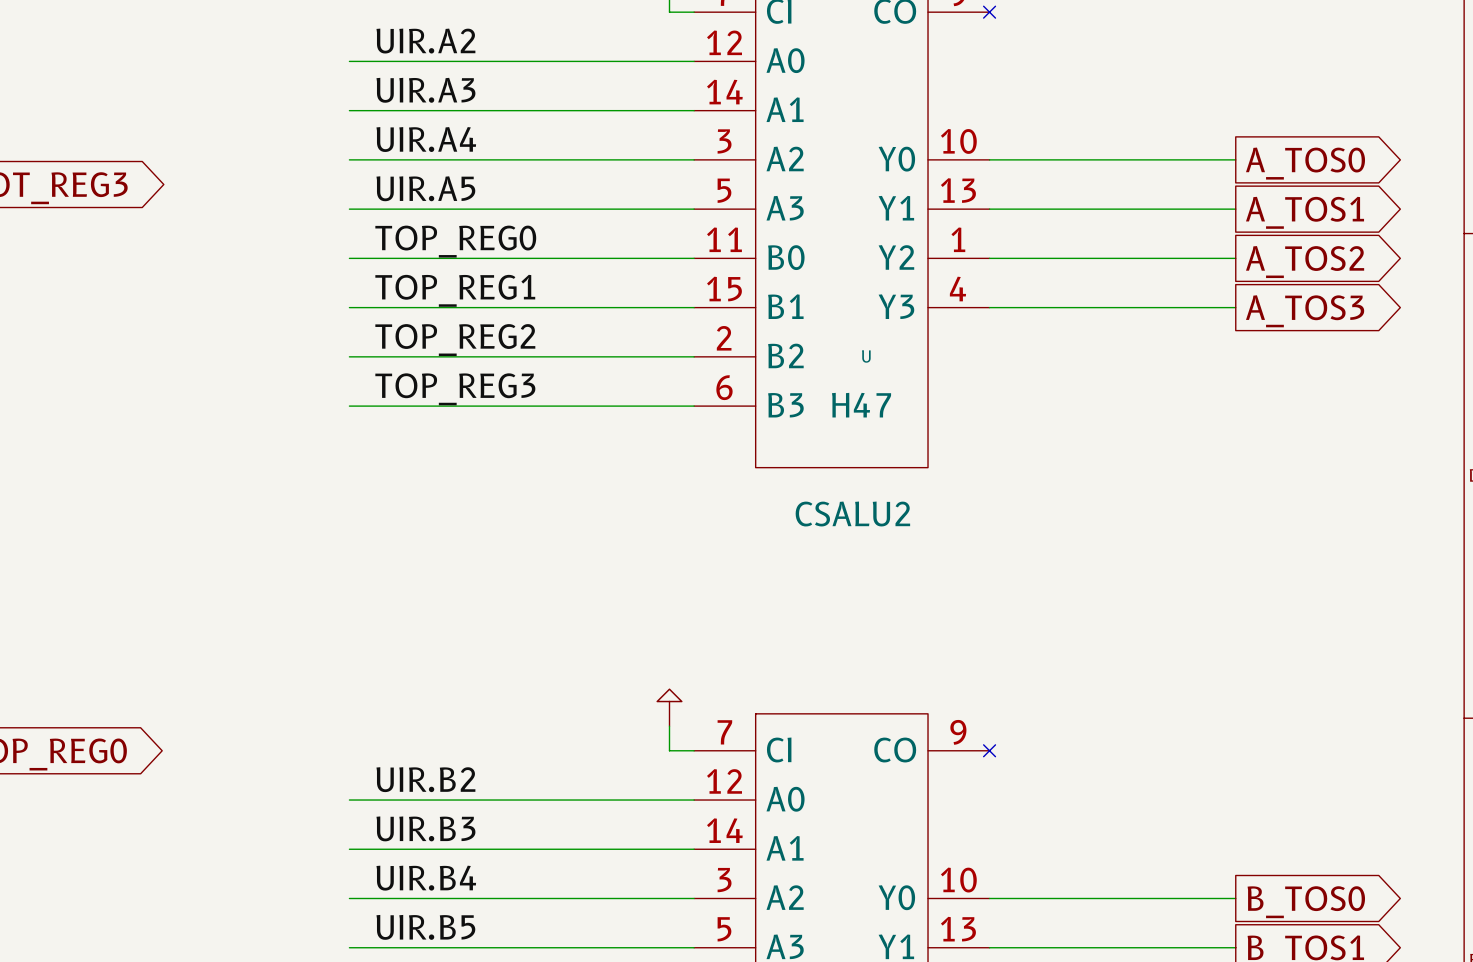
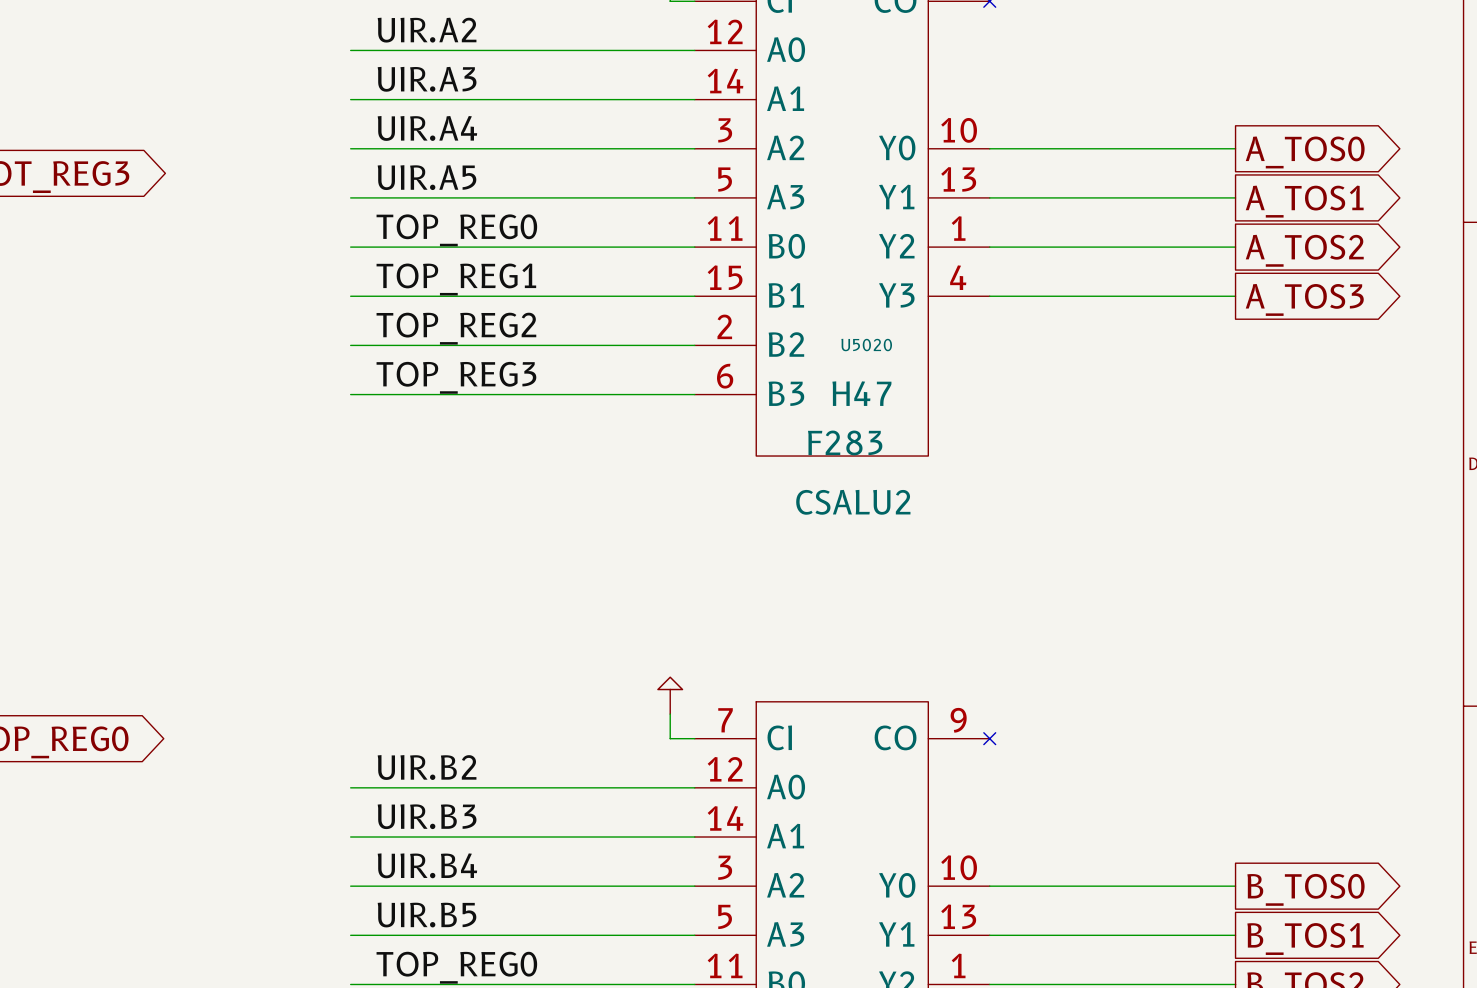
U name: U (866, 356) -> U5020 (866, 345)
U value: none -> F283 (845, 442)

